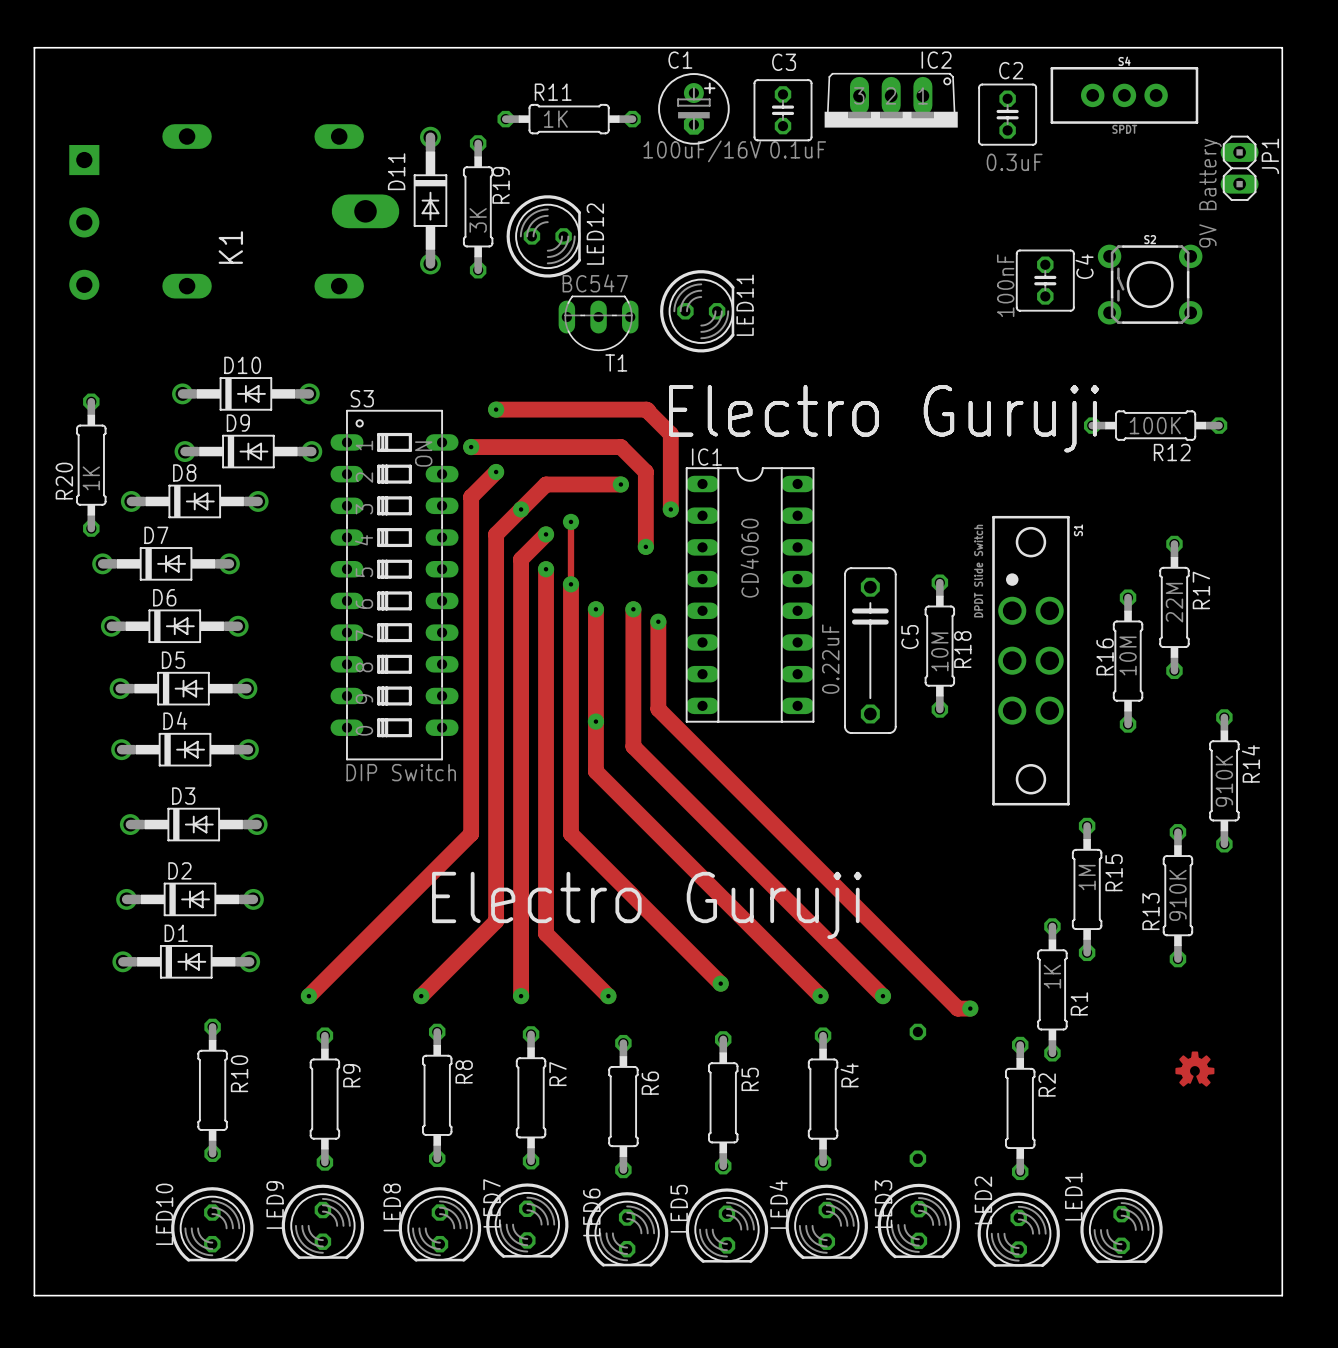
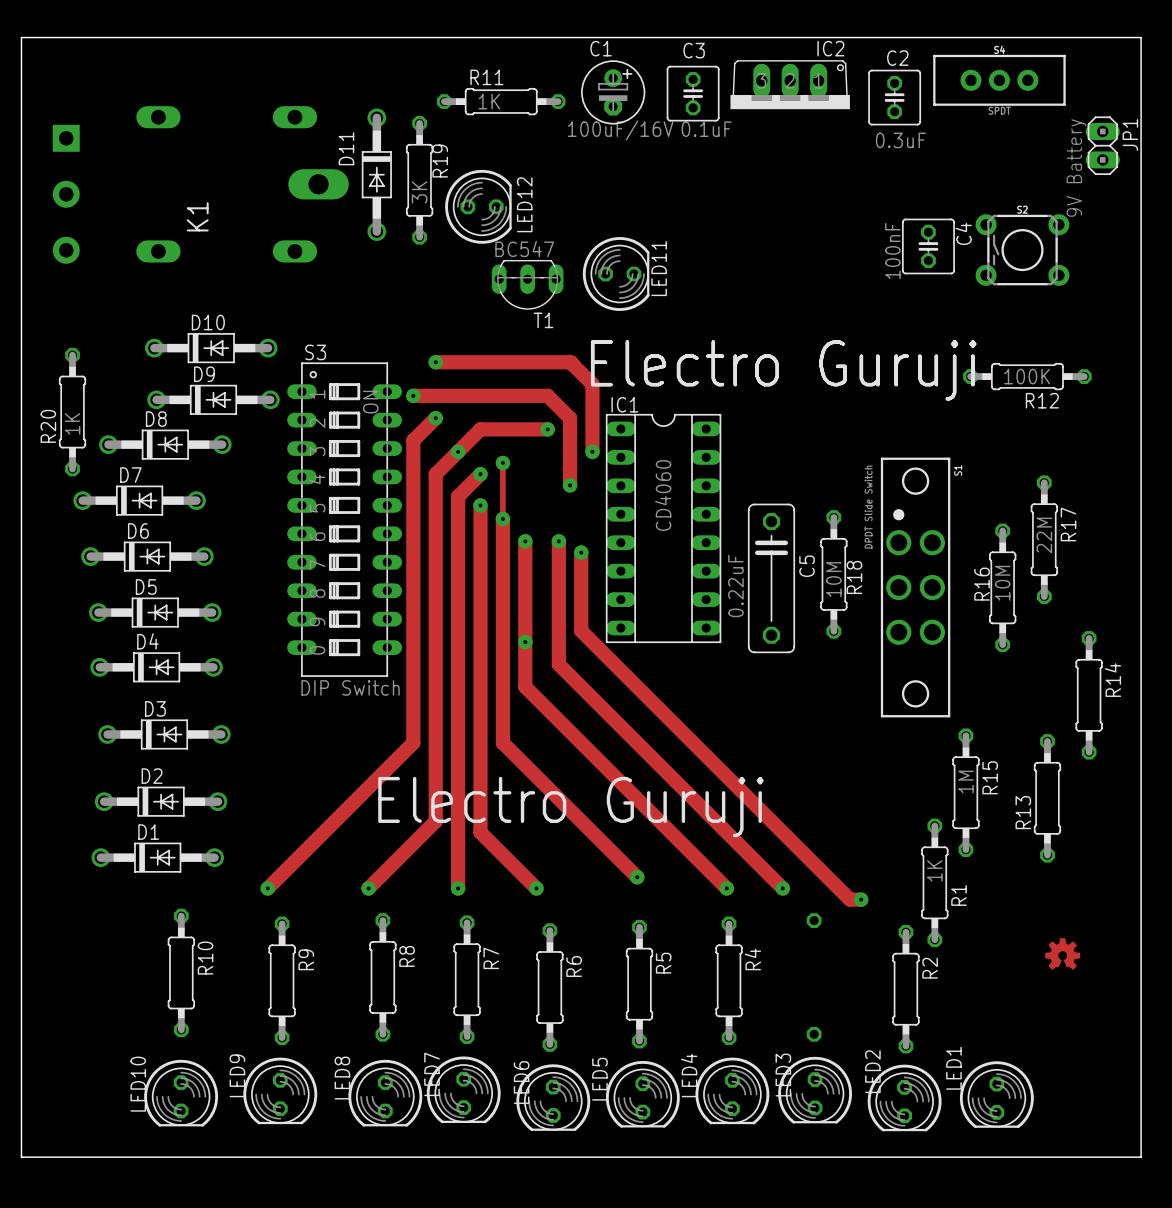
R14 value: 910K (1224, 781) -> none
R13 value: 910K (1177, 895) -> none

